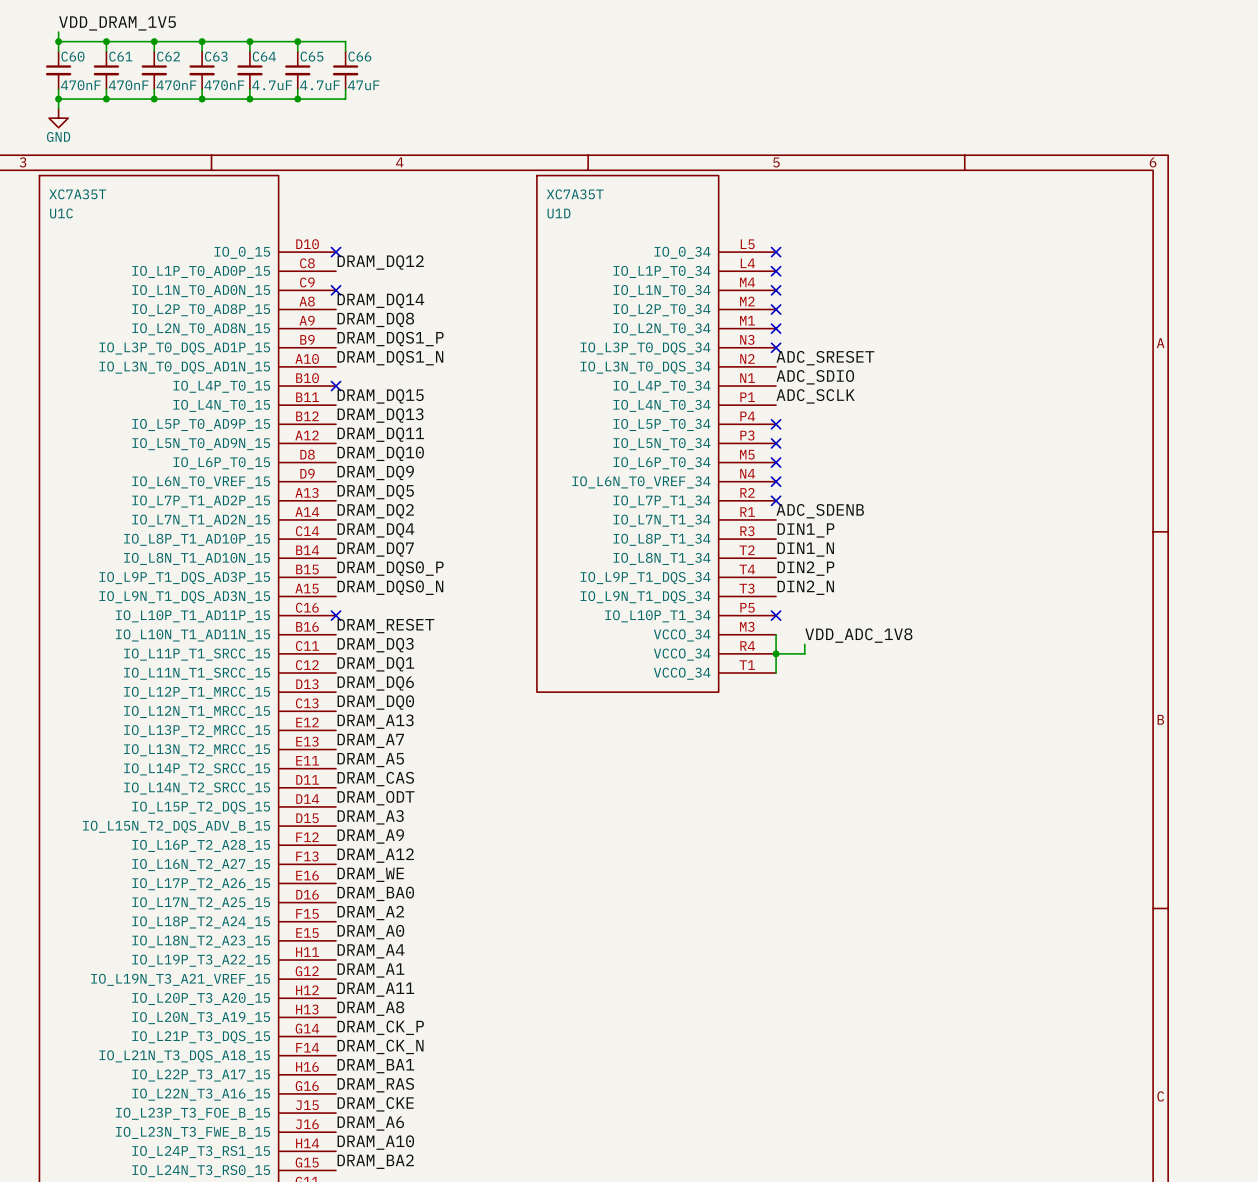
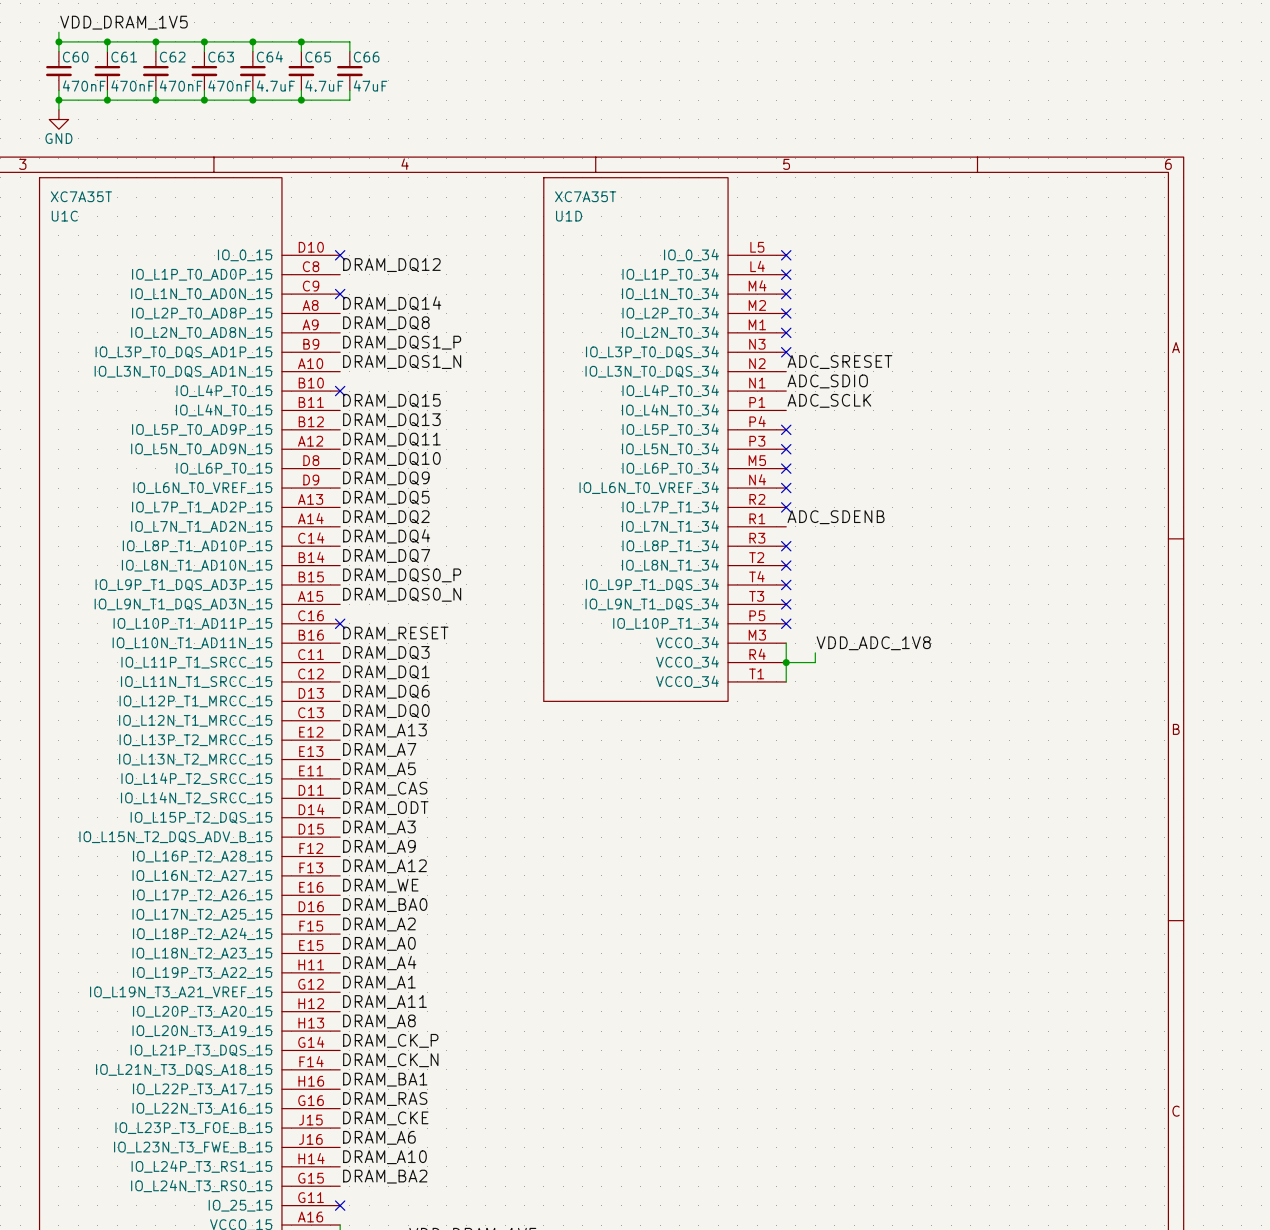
label: DIN1_P (805, 530) -> none
no-connect mark: none -> (786, 546)
label: DIN1_N (805, 549) -> none
no-connect mark: none -> (786, 565)
label: DIN2_P (805, 568) -> none
no-connect mark: none -> (786, 584)
label: DIN2_N (805, 587) -> none
no-connect mark: none -> (786, 604)

